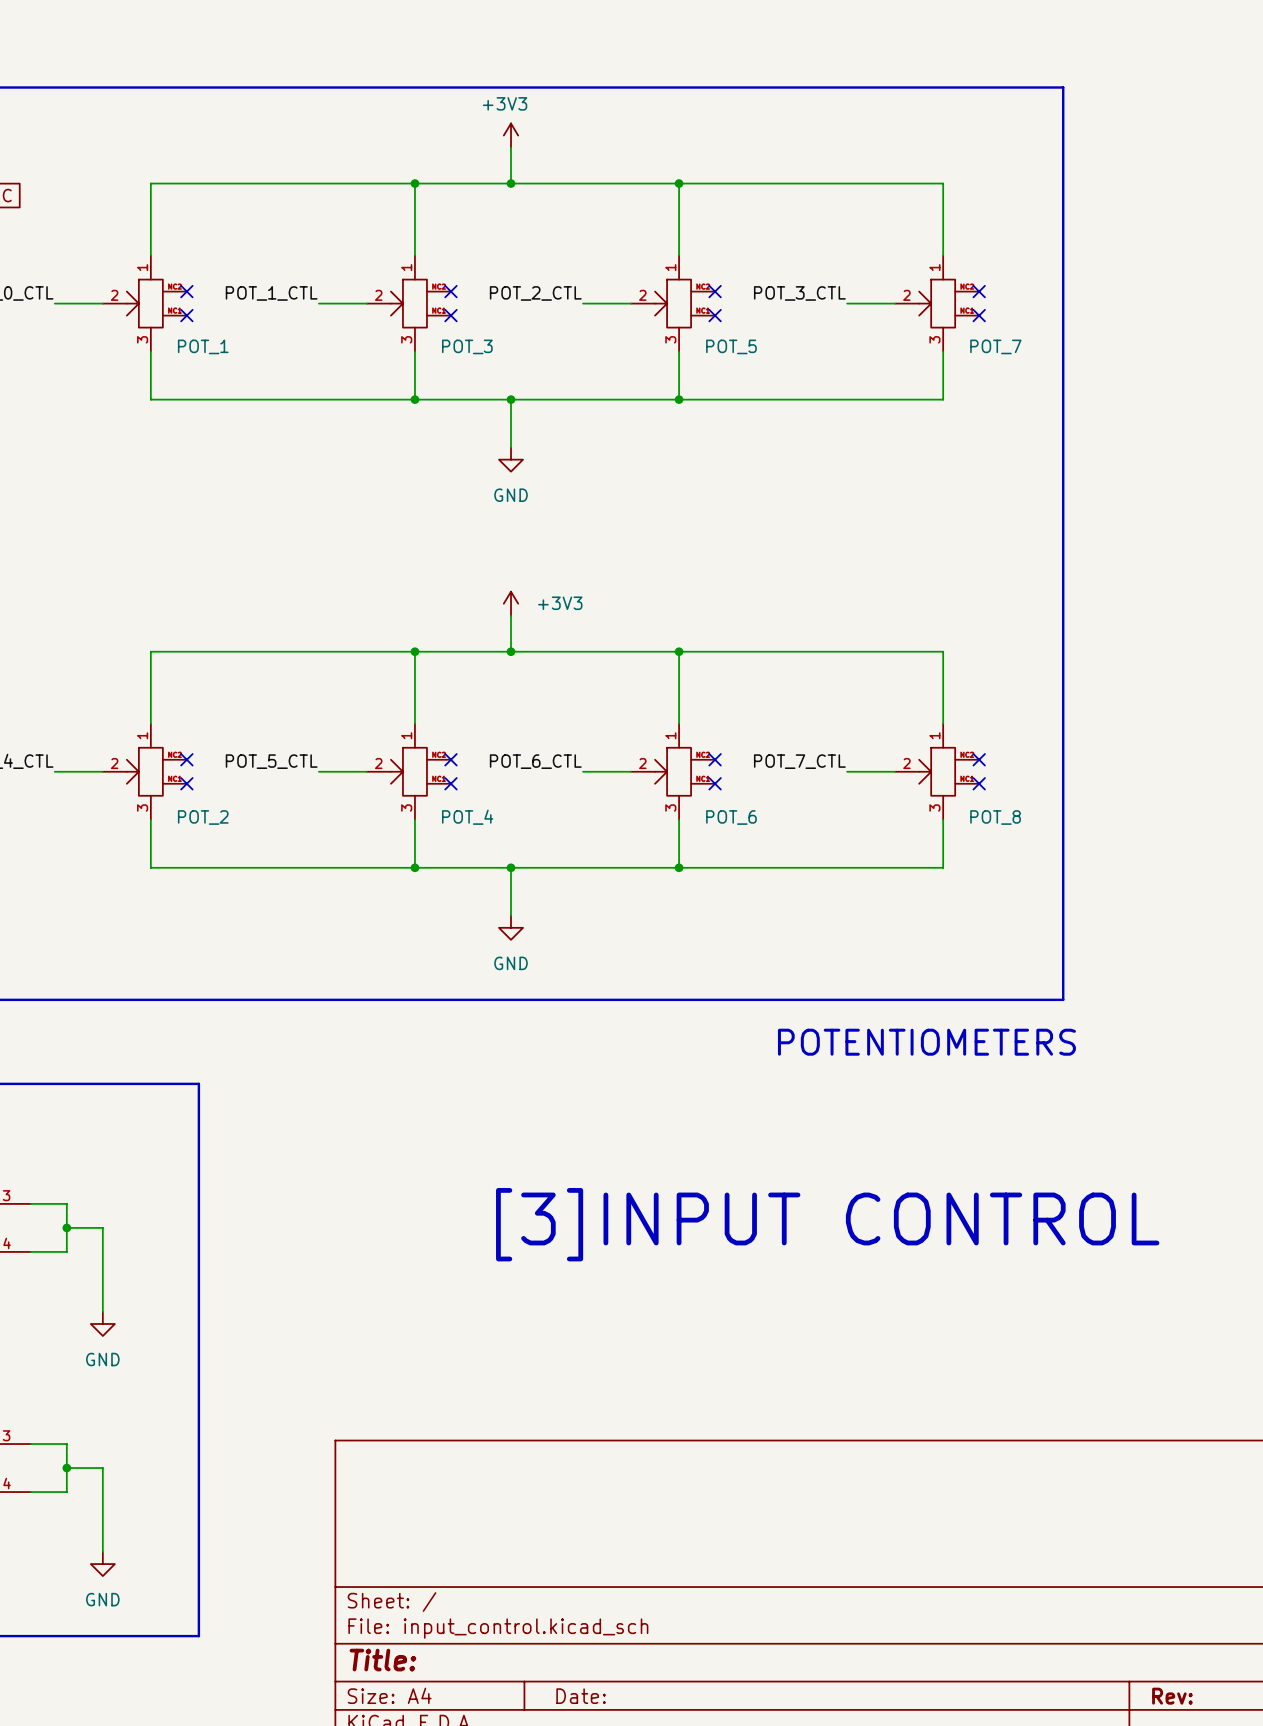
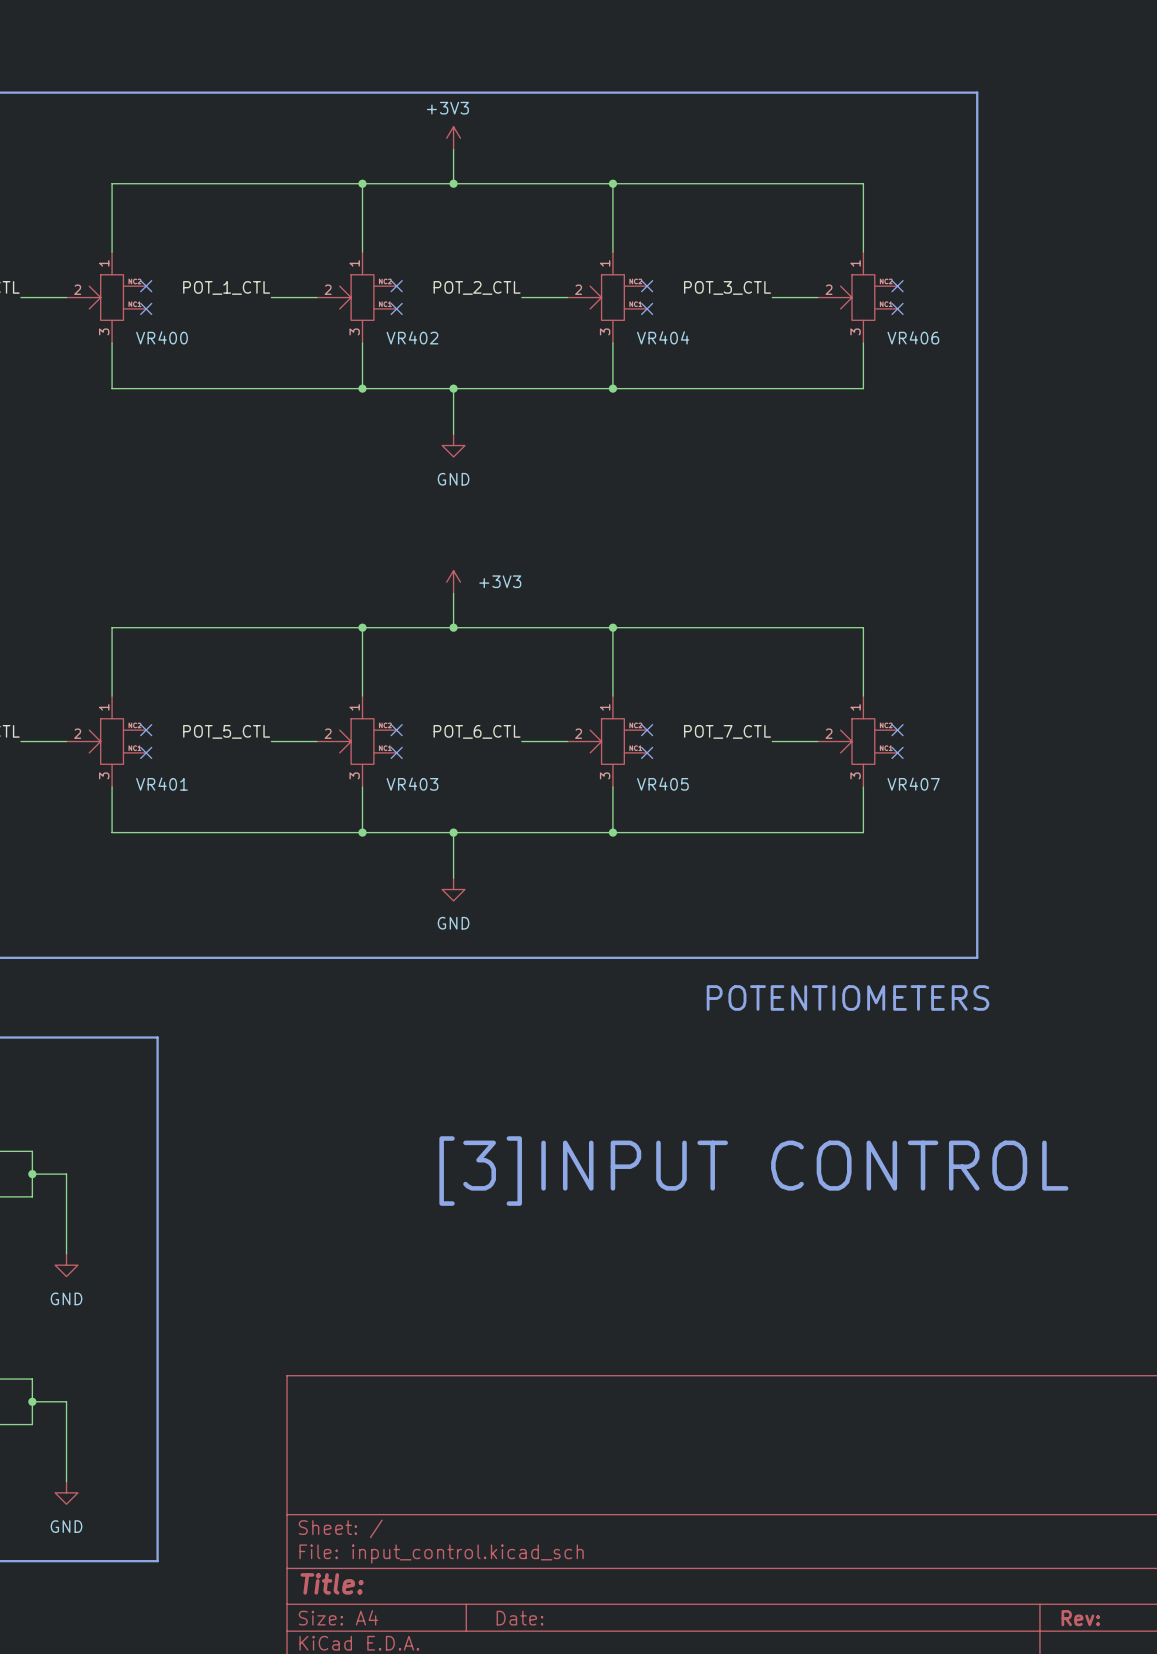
POT_1 name: POT_1 (203, 346) -> VR400 (162, 337)
POT_3 name: POT_3 (467, 346) -> VR402 (412, 337)
POT_5 name: POT_5 (731, 346) -> VR404 (663, 337)
POT_7 name: POT_7 (995, 346) -> VR406 (913, 337)
POT_2 name: POT_2 (203, 817) -> VR401 (162, 784)
POT_4 name: POT_4 (467, 817) -> VR403 (412, 784)
POT_6 name: POT_6 (731, 817) -> VR405 (662, 784)
POT_8 name: POT_8 (995, 817) -> VR407 (913, 784)

